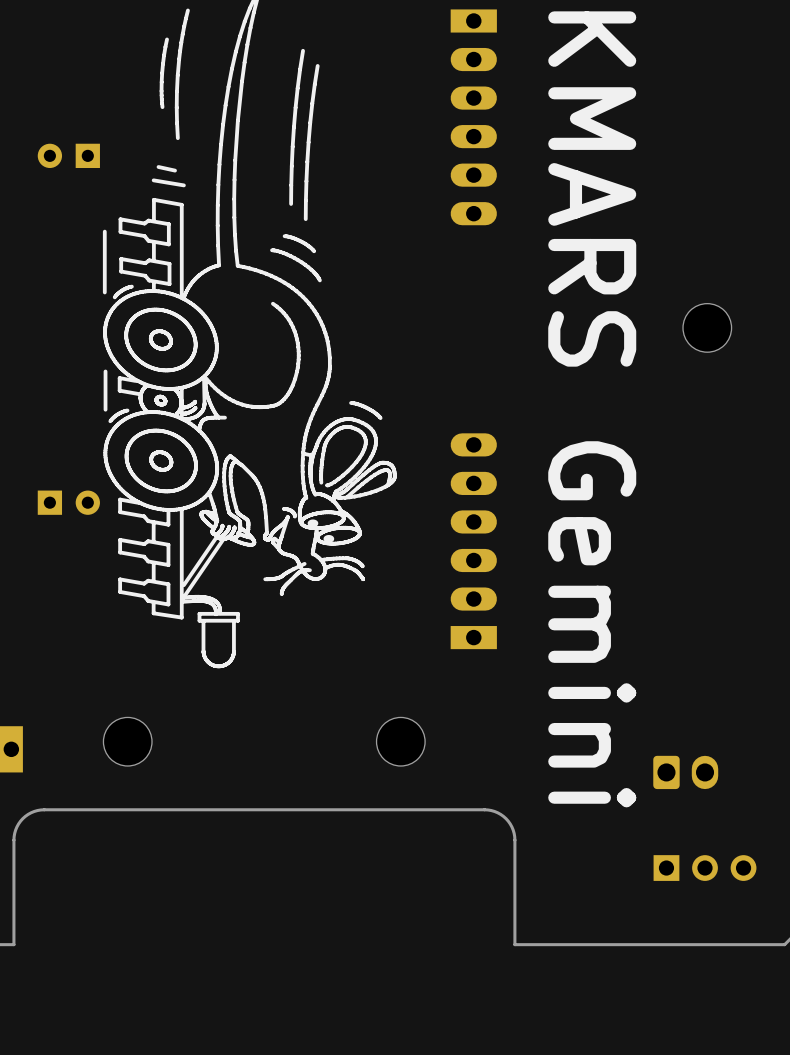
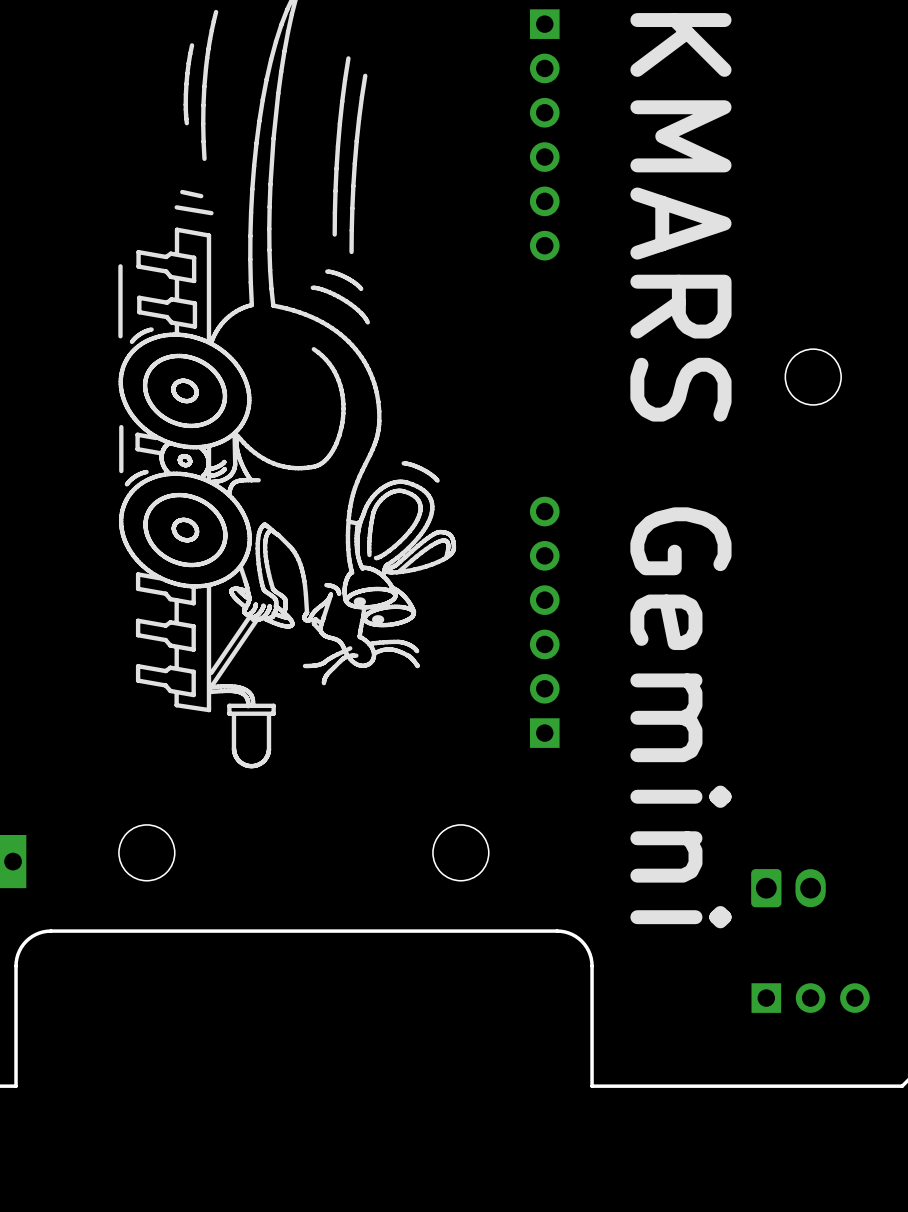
part footprint: [450, 9, 497, 226] -> [529, 9, 560, 261]
part: (68, 155) -> none
part footprint: [450, 433, 497, 650] -> [529, 496, 560, 748]
part: (68, 502) -> none

